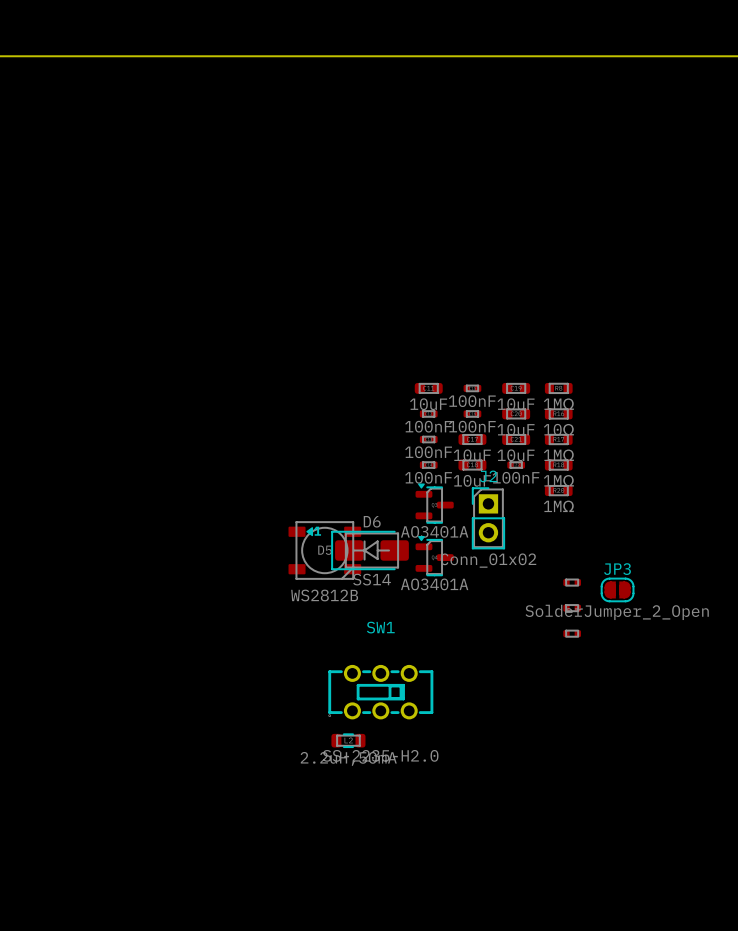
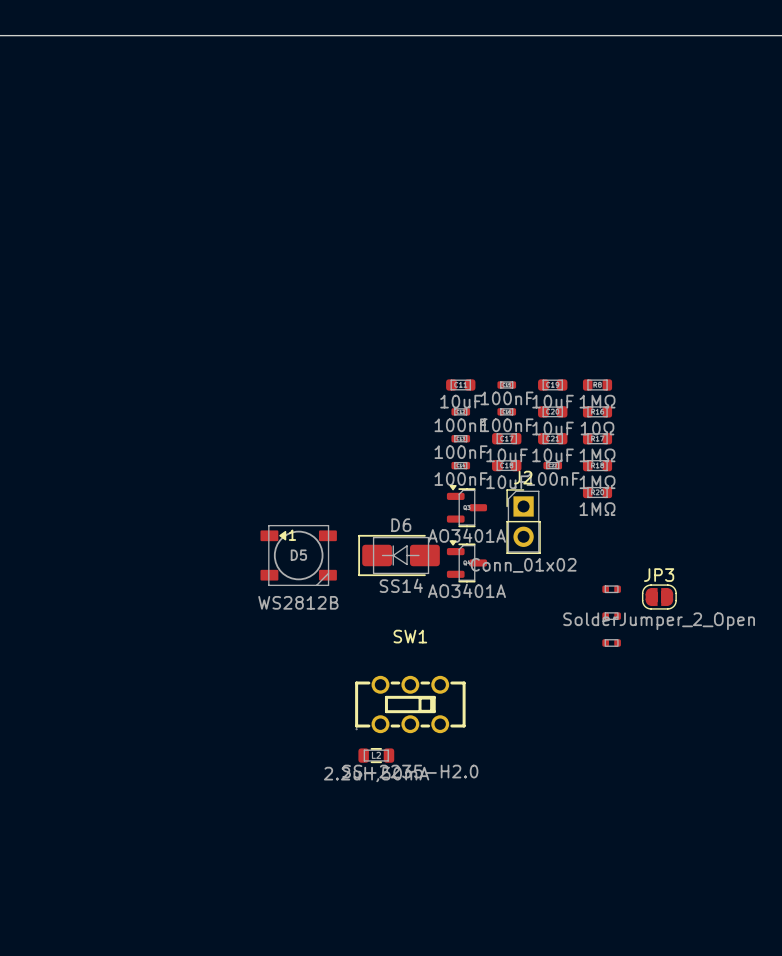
D5 position: (324, 550) -> (298, 555)

